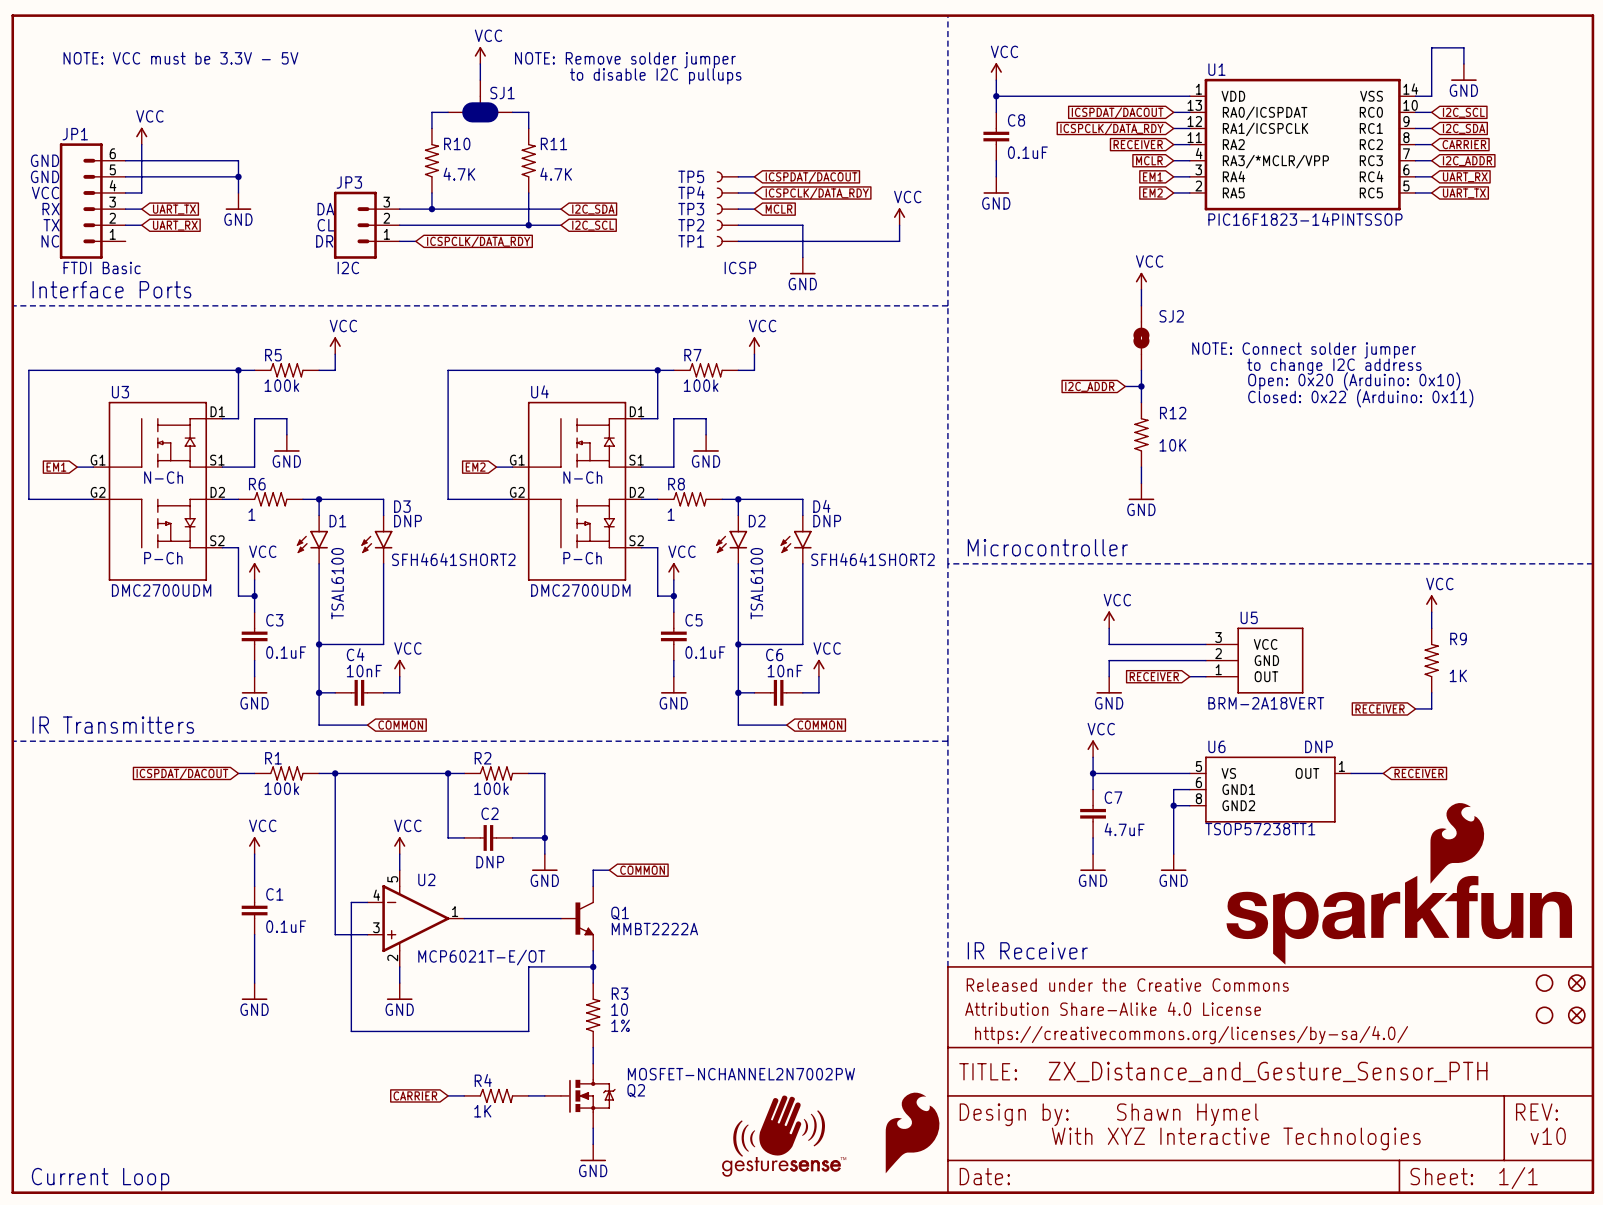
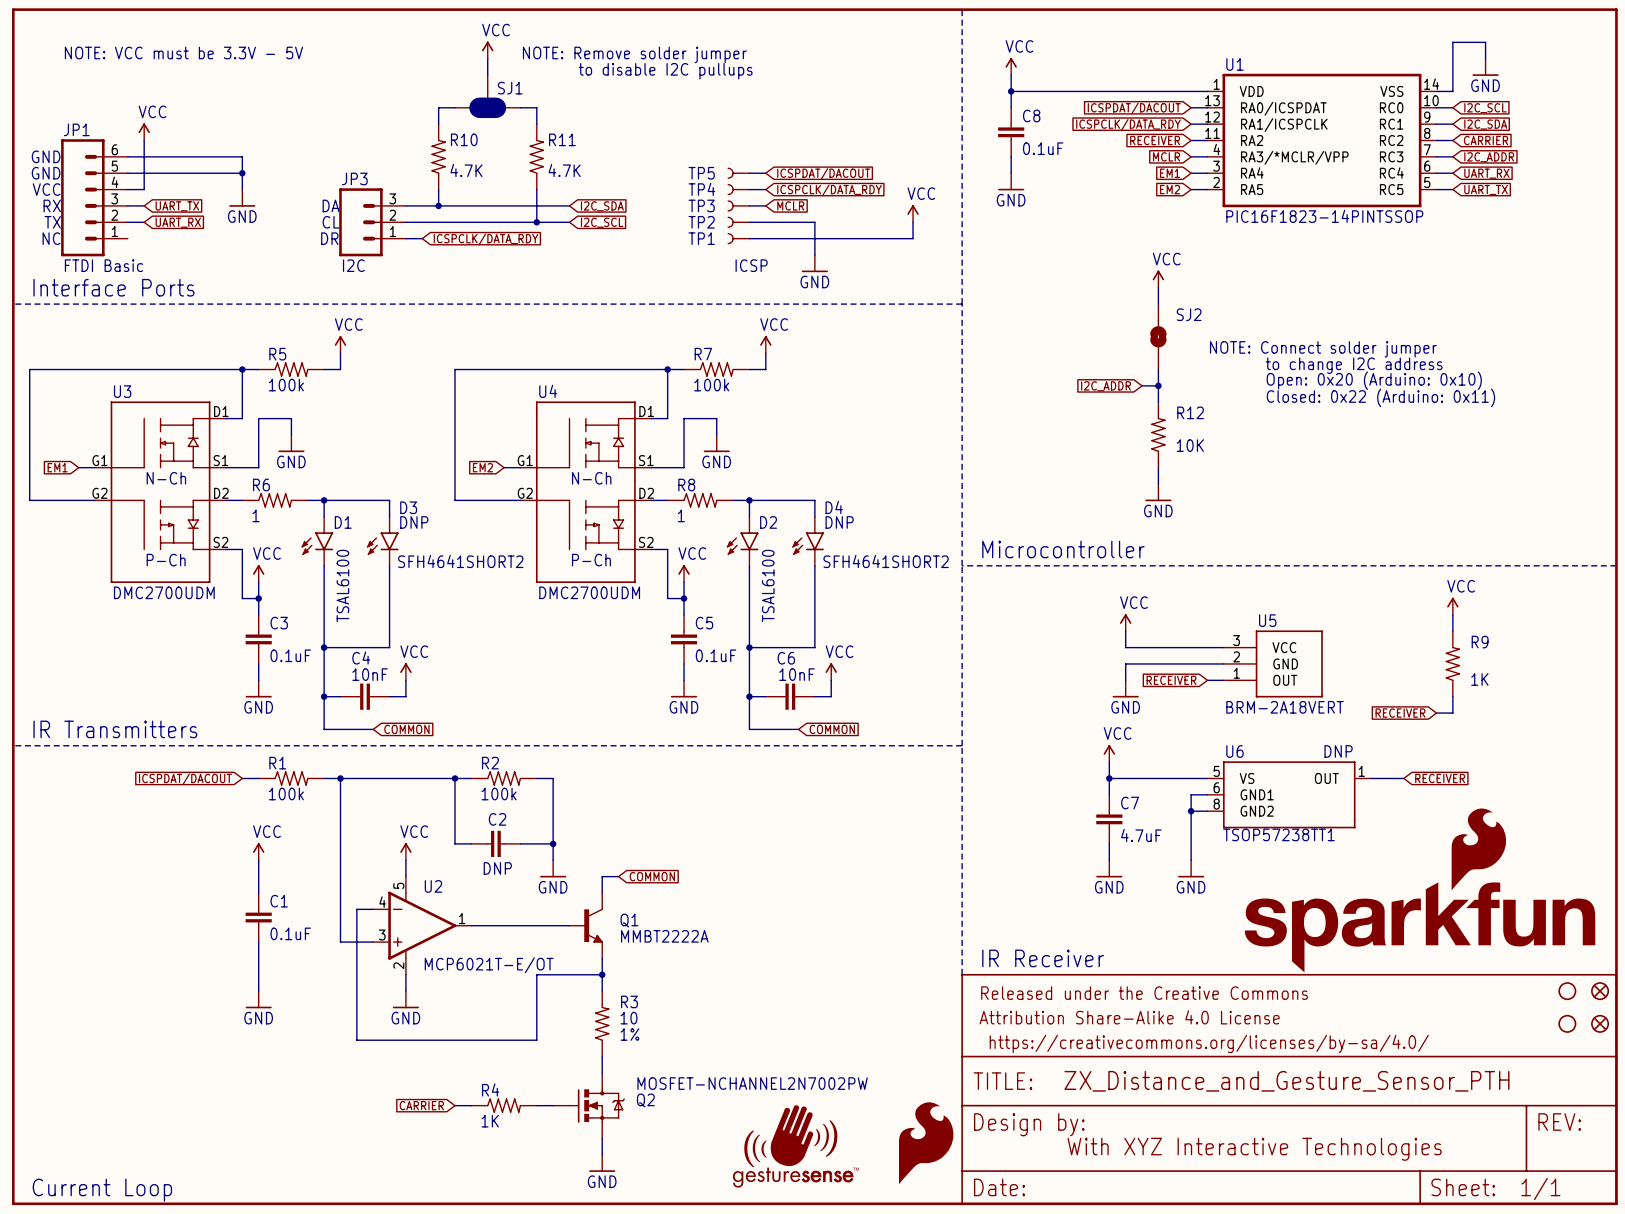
part text: Shawn Hymel (1187, 1114) -> none
part text: v10 (1548, 1136) -> none

